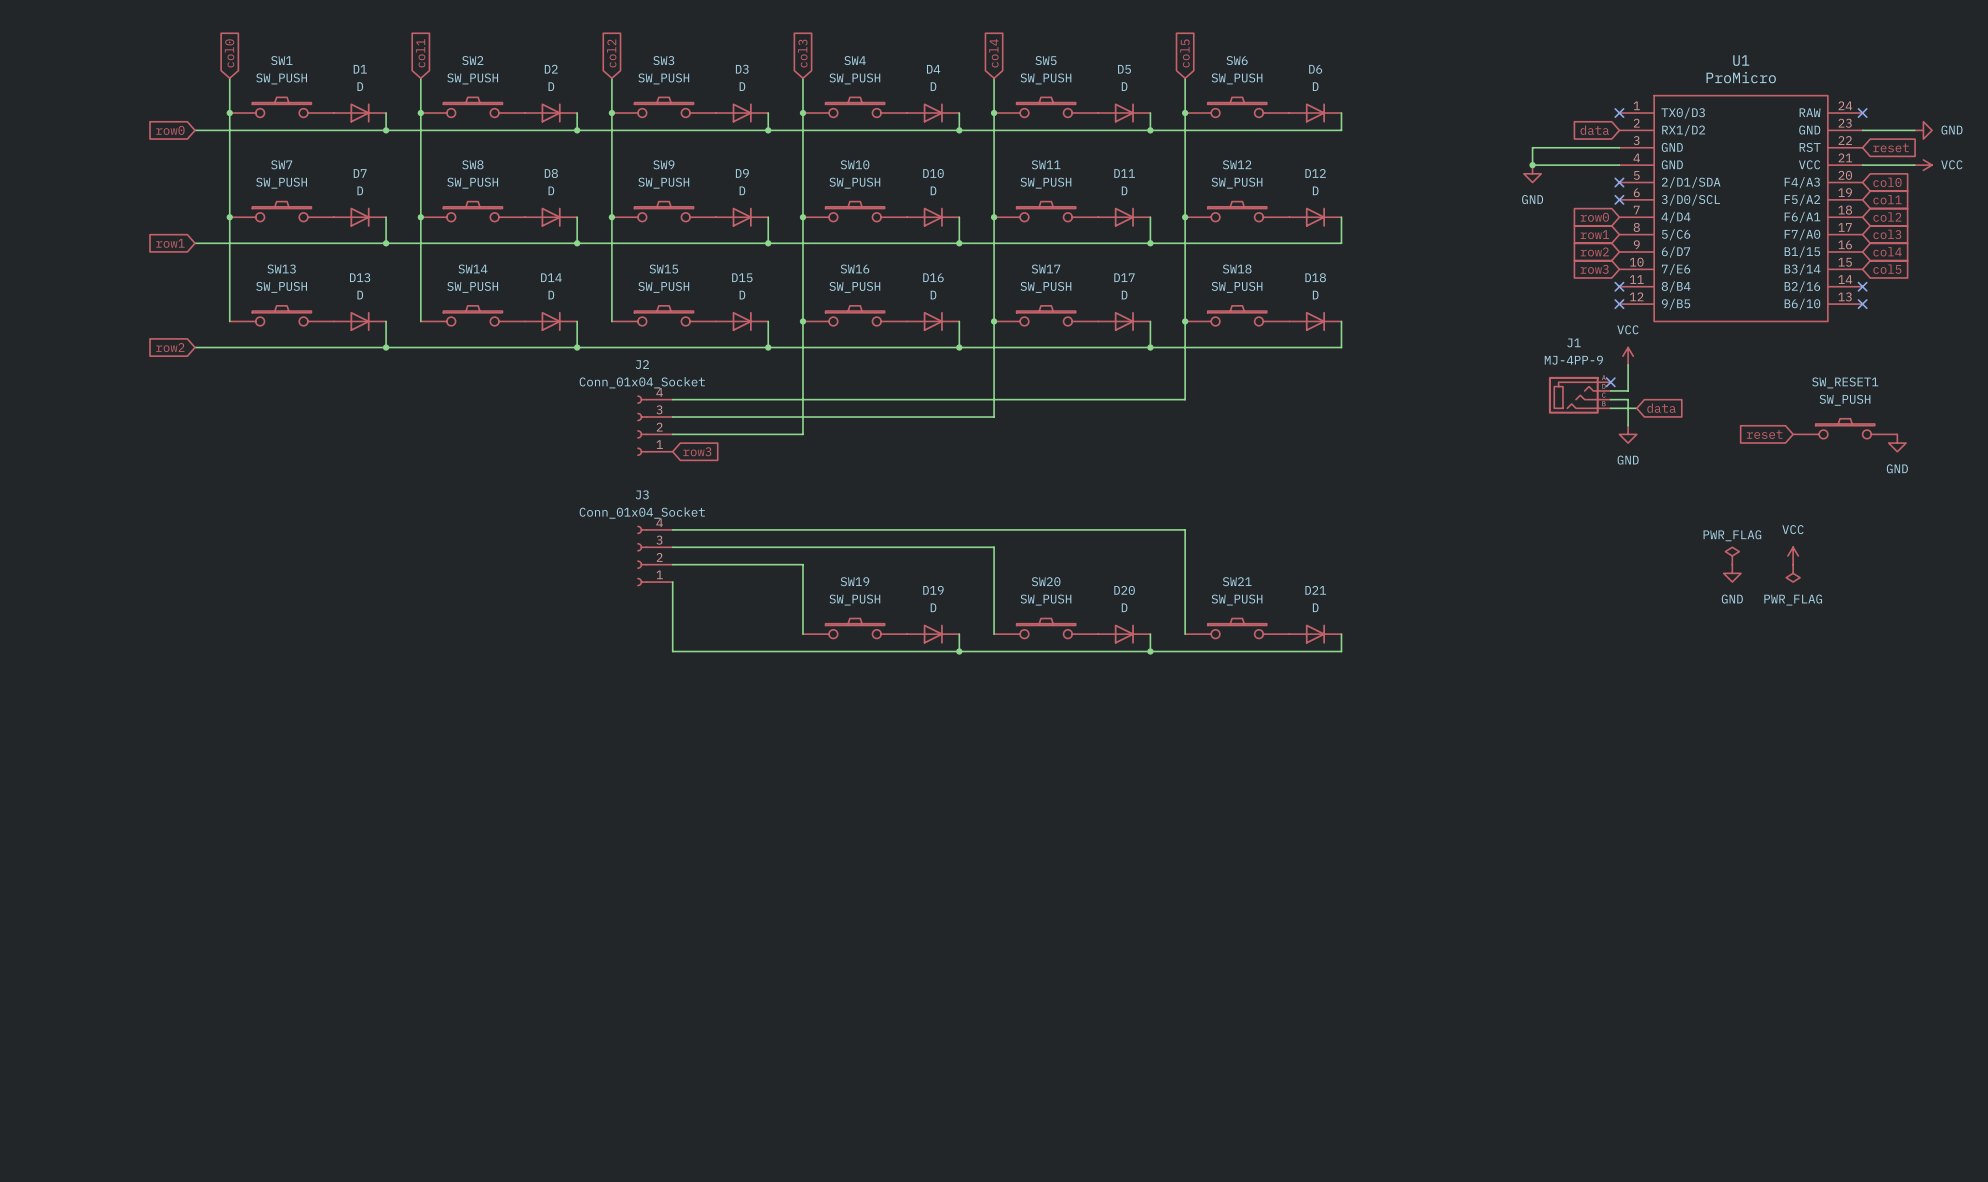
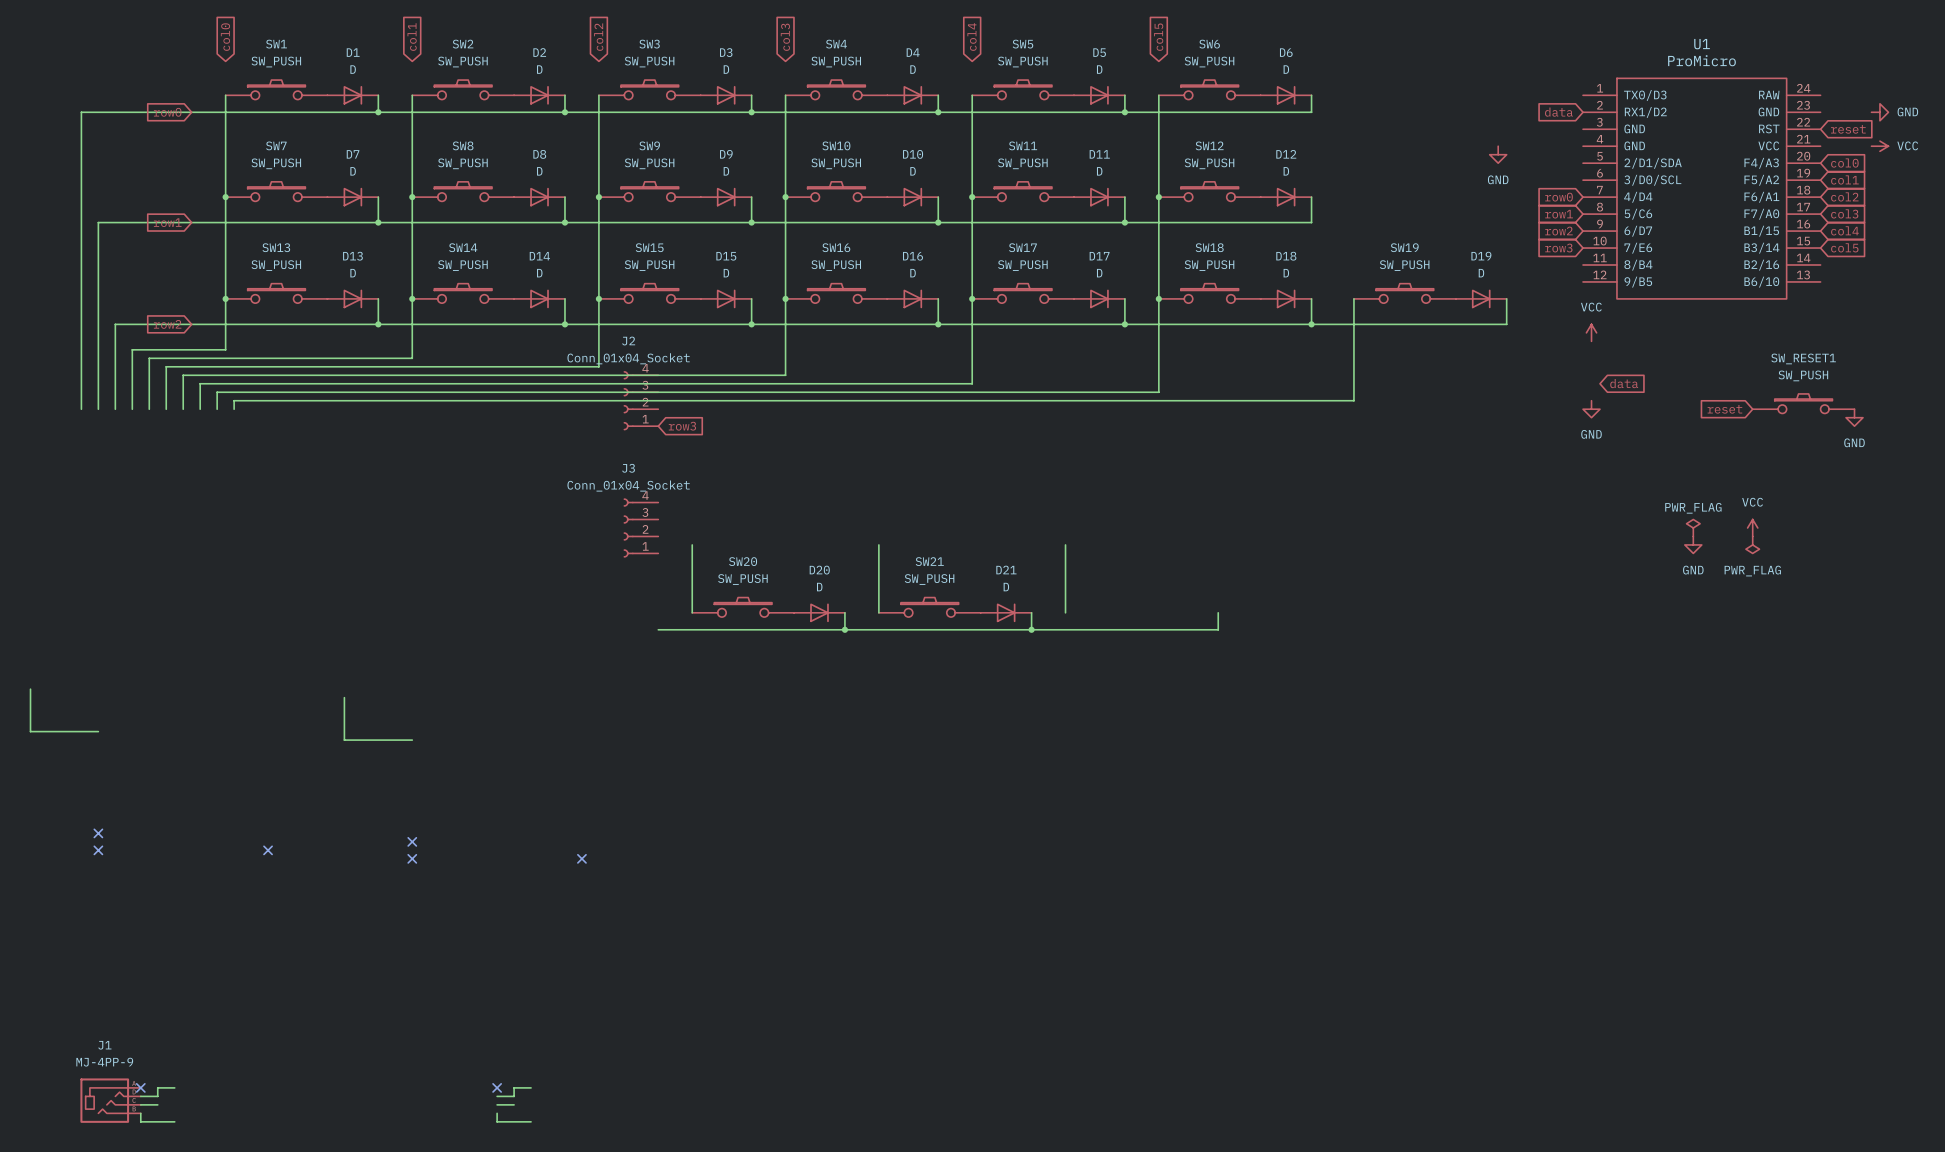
wire: (229, 78) (229, 113) -> none
wire: (420, 78) (420, 113) -> none
wire: (611, 78) (611, 113) -> none
wire: (802, 78) (802, 113) -> none
wire: (994, 78) (994, 113) -> none
wire: (1185, 78) (1185, 113) -> none
junction: (229, 113) -> none
junction: (420, 113) -> none
junction: (611, 113) -> none
junction: (802, 113) -> none
junction: (994, 113) -> none
junction: (1185, 113) -> none
no-connect mark: (1619, 113) -> none
no-connect mark: (1862, 113) -> none
wire: none -> (191, 112) (81, 112) (81, 409)
wire: (1862, 130) (1914, 130) -> none
wire: (1619, 147) (1532, 147) (1532, 165) (1619, 165) -> none
junction: (1532, 165) -> none
wire: (1862, 165) (1914, 165) -> none
no-connect mark: (1619, 182) -> none
no-connect mark: (1619, 199) -> none
wire: none -> (191, 222) (98, 222) (98, 409)
no-connect mark: (1619, 286) -> none
no-connect mark: (1862, 286) -> none
no-connect mark: (1619, 304) -> none
no-connect mark: (1862, 304) -> none
wire: none -> (225, 298) (225, 349) (132, 349) (132, 409)
junction: none -> (225, 298)
wire: none -> (412, 298) (412, 358) (149, 358) (149, 409)
junction: none -> (412, 298)
wire: none -> (598, 298) (598, 366) (166, 366) (166, 409)
junction: none -> (598, 298)
wire: none -> (1353, 298) (1353, 400) (234, 400) (234, 409)
wire: none -> (1506, 298) (1506, 324) (1311, 324)
wire: none -> (191, 324) (115, 324) (115, 409)
junction: none -> (1311, 324)
wire: (1628, 364) (1628, 390) (1610, 390) -> none
J1 symbol: [1548, 376, 1611, 414] -> [80, 1078, 141, 1123]
no-connect mark: (1610, 382) -> none
wire: none -> (658, 375) (183, 375) (183, 409)
wire: (1185, 399) (802, 399) (802, 434) (672, 434) -> none
wire: (1610, 399) (1628, 399) (1628, 425) -> none
wire: (994, 408) (994, 417) -> (1158, 375) (1158, 392) (972, 392)
wire: none -> (972, 383) (200, 383) (200, 409)
wire: (1610, 408) (1636, 408) -> none
wire: none -> (658, 392) (217, 392) (217, 409)
wire: (672, 529) (1185, 529) (1185, 634) -> none
wire: (672, 547) (994, 547) (994, 634) -> none
wire: (672, 564) (802, 564) (802, 634) -> none
wire: none -> (692, 544) (692, 612)
wire: none -> (878, 544) (878, 612)
wire: none -> (1065, 544) (1065, 612)
wire: (672, 582) (672, 651) (1341, 651) (1341, 634) -> none
SW19 position: (855, 628) -> (1404, 293)
SW20 position: (1046, 628) -> (743, 607)
SW21 position: (1237, 628) -> (929, 607)
D19 position: (933, 634) -> (1481, 298)
wire: (959, 634) (959, 651) -> (844, 612) (844, 629)
D20 position: (1124, 634) -> (819, 612)
wire: (1150, 634) (1150, 651) -> (1031, 612) (1031, 629)
D21 position: (1315, 634) -> (1006, 612)
wire: none -> (1218, 612) (1218, 629) (658, 629)
junction: (959, 651) -> none
junction: (1150, 651) -> none
junction: none -> (844, 629)
junction: none -> (1031, 629)
wire: none -> (30, 689) (30, 731) (98, 731)
wire: none -> (344, 697) (344, 740) (412, 740)
no-connect mark: none -> (98, 833)
no-connect mark: none -> (412, 841)
no-connect mark: none -> (98, 850)
no-connect mark: none -> (268, 850)
no-connect mark: none -> (412, 858)
no-connect mark: none -> (581, 858)
no-connect mark: none -> (140, 1087)
wire: none -> (174, 1087) (157, 1087) (157, 1096) (140, 1096)
no-connect mark: none -> (497, 1087)
wire: none -> (531, 1087) (514, 1087) (514, 1096) (497, 1096)
wire: none -> (140, 1104) (157, 1104)
wire: none -> (497, 1104) (514, 1104)
wire: none -> (140, 1113) (140, 1121) (174, 1121)
wire: none -> (497, 1113) (497, 1121) (531, 1121)

